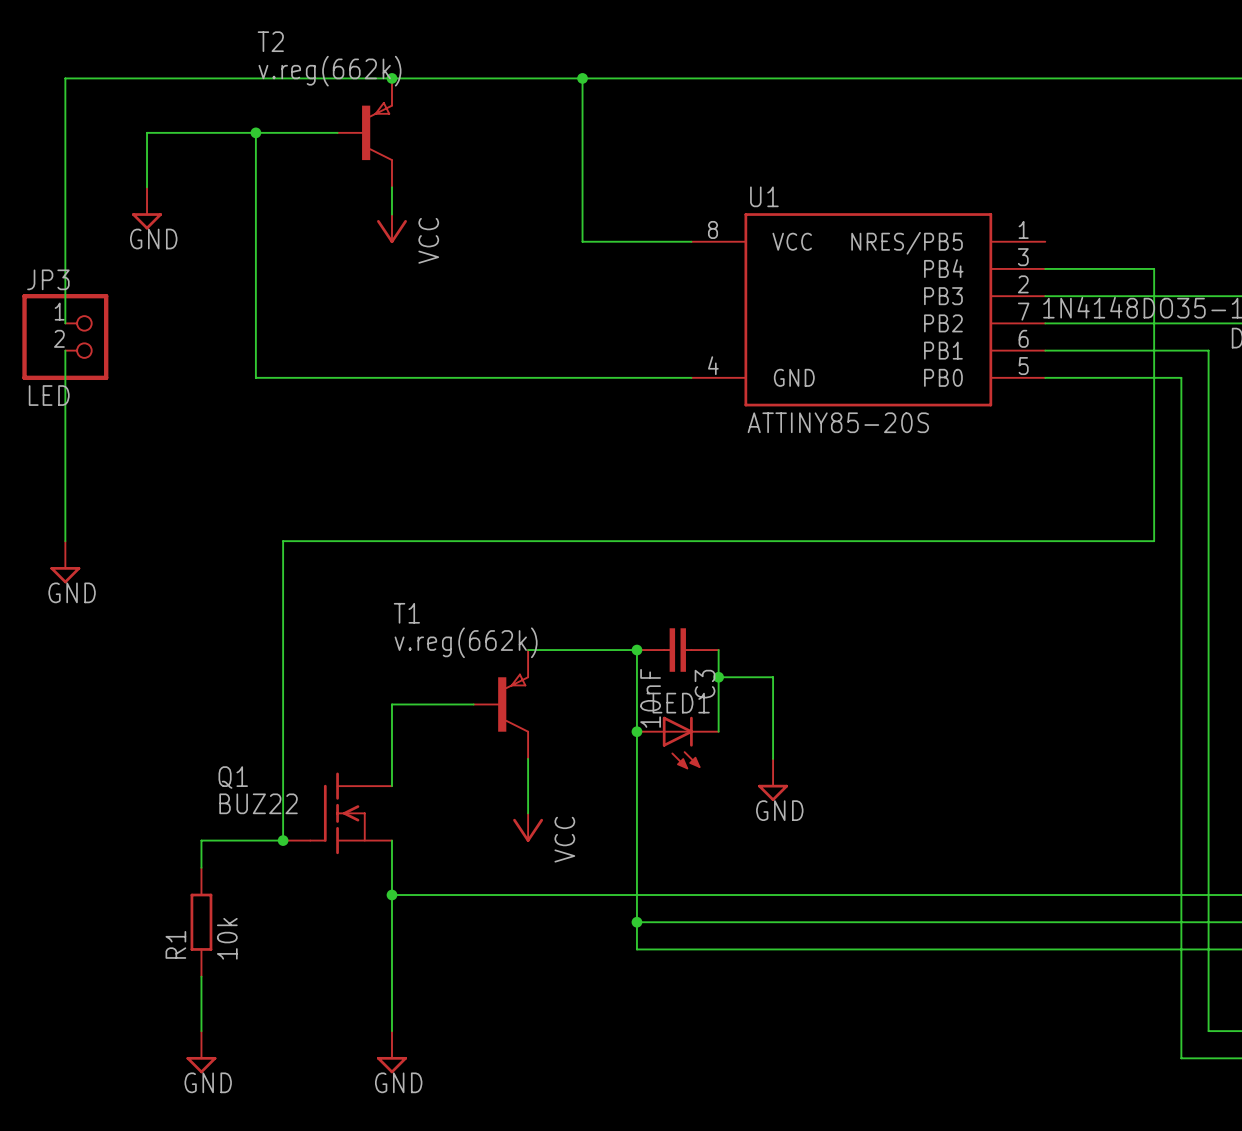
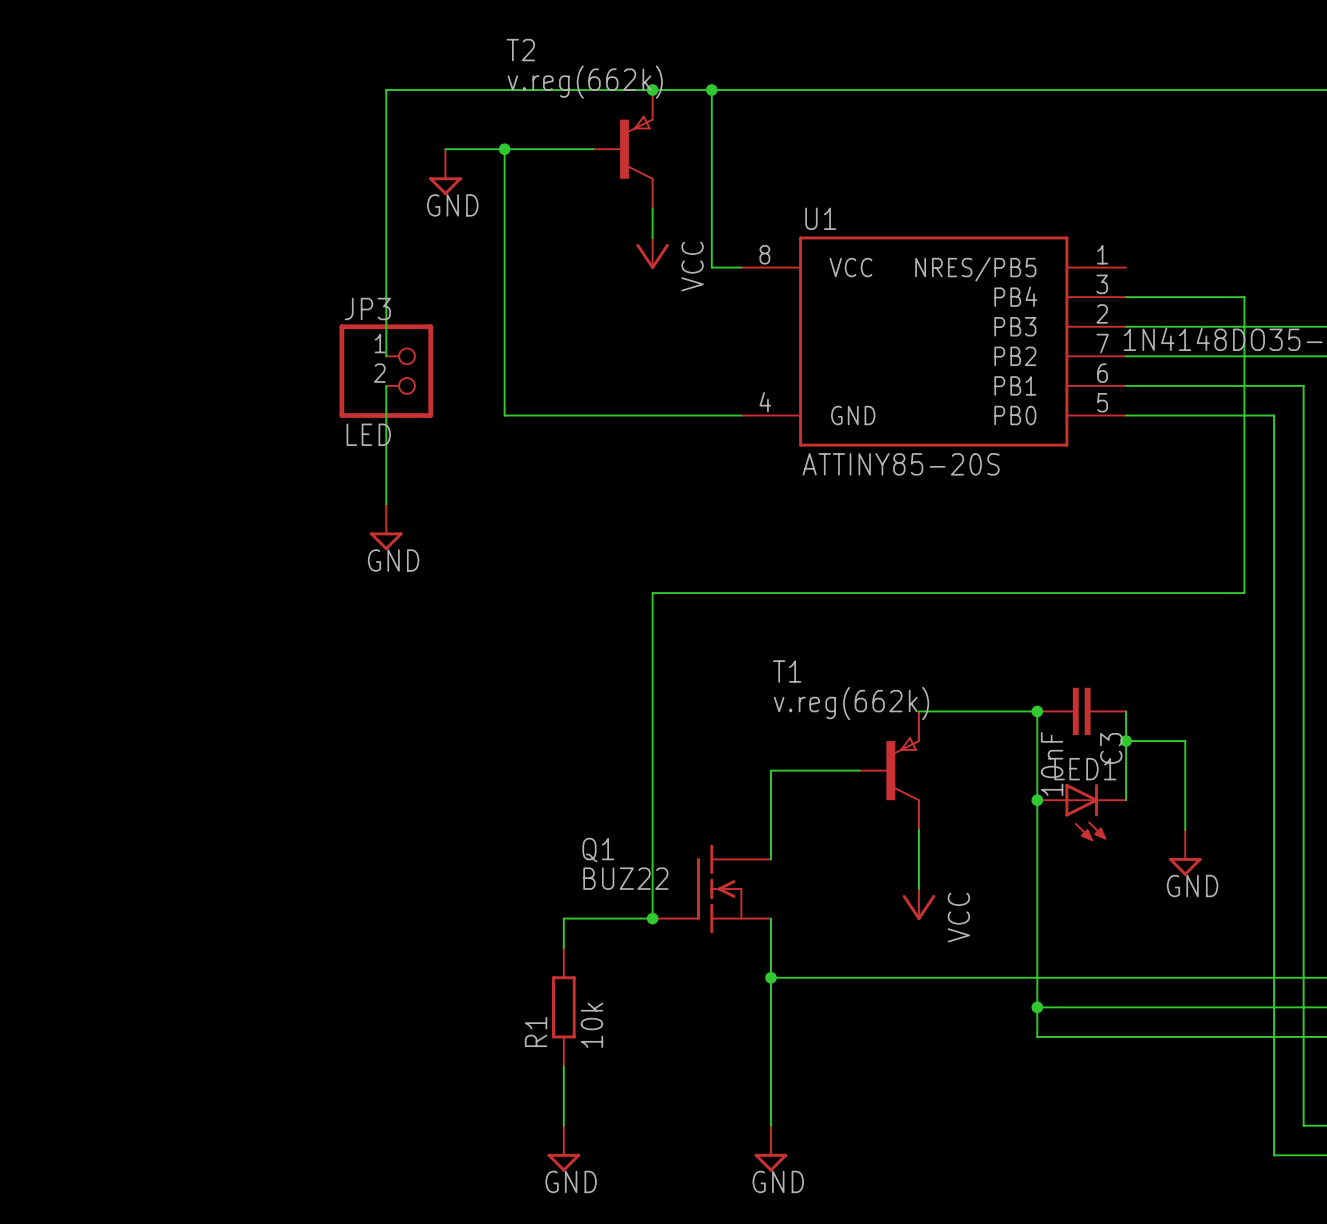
wire: (364, 78) (65, 78) (65, 323) -> (386, 90) (386, 356)
junction: (391, 78) -> none
wire: (582, 78) (582, 241) (664, 241) -> (711, 90) (711, 267)
junction position: (582, 78) -> (652, 90)
junction: none -> (711, 90)
wire: (255, 132) (255, 377) (473, 377) -> (504, 149) (504, 415)
junction: (255, 132) -> none
wire: (337, 132) (147, 132) (147, 187) -> none
T2 position: (365, 132) -> (623, 149)
wire: none -> (445, 149) (593, 149)
junction: none -> (504, 149)
power symbol: none -> GND (445, 172)
wire: (391, 187) (391, 214) -> (652, 208) (652, 237)
power symbol: GND (147, 208) -> none
power symbol position: VCC (391, 228) -> VCC (652, 253)
JP3 position: (65, 337) -> (386, 371)
wire: (65, 350) (65, 541) -> none
wire: none -> (386, 385) (386, 504)
power symbol: none -> GND (386, 527)
wire: (609, 541) (283, 541) (283, 840) (201, 840) (201, 867) -> (652, 593) (652, 918) (563, 918) (563, 948)
power symbol: GND (65, 562) -> none
wire: (528, 650) (636, 650) (636, 949) (963, 949) -> (918, 711) (1037, 711) (1037, 1036)
junction: (636, 650) -> none
C3 position: (677, 650) -> (1081, 711)
wire: (718, 650) (718, 704) -> (859, 770) (770, 770)
junction: none -> (1037, 711)
wire: none -> (1126, 711) (1126, 800)
wire: (718, 677) (773, 677) (773, 758) -> none
junction: (718, 677) -> none
wire: none -> (1126, 741) (1185, 741) (1185, 829)
junction: none -> (1126, 741)
wire: (473, 704) (391, 704) (391, 786) -> none
T1 position: (501, 704) -> (889, 770)
junction: (636, 731) -> none
junction: none -> (1037, 800)
LED1 position: (677, 742) -> (1081, 812)
wire: (528, 758) (528, 813) -> (770, 800) (770, 859)
wire: none -> (918, 829) (918, 888)
power symbol: GND (773, 780) -> none
power symbol: none -> GND (1185, 852)
Q1 position: (337, 813) -> (711, 888)
power symbol: VCC (528, 827) -> none
power symbol: none -> VCC (918, 904)
junction: (283, 840) -> none
wire: (391, 840) (391, 1031) -> none
junction: none -> (652, 918)
wire: none -> (770, 918) (770, 1125)
wire: (391, 895) (718, 895) -> none
junction: (391, 895) -> none
junction: none -> (770, 977)
R1 position: (201, 922) -> (563, 1007)
wire: (636, 922) (963, 922) -> none
junction: (636, 922) -> none
junction: none -> (1037, 1007)
wire: (201, 976) (201, 1031) -> none
wire: none -> (563, 1066) (563, 1125)
power symbol: GND (201, 1052) -> none
power symbol position: GND (391, 1052) -> GND (563, 1148)
power symbol: none -> GND (770, 1148)

